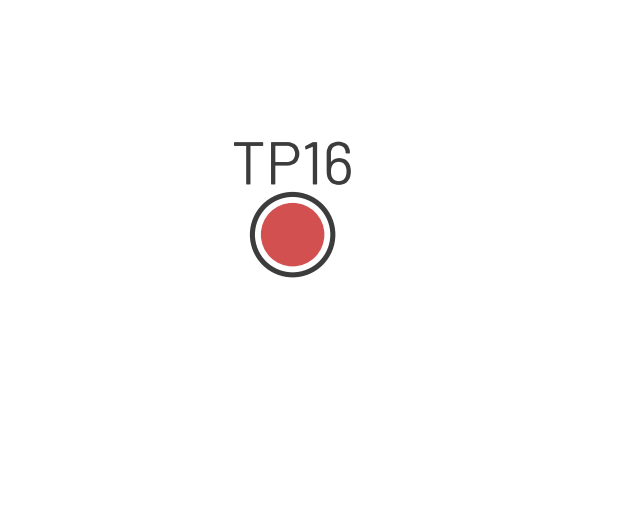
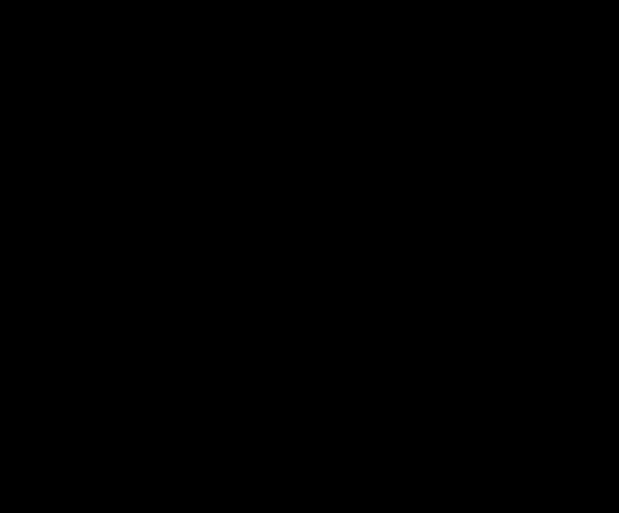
TP16: (292, 234) -> none

